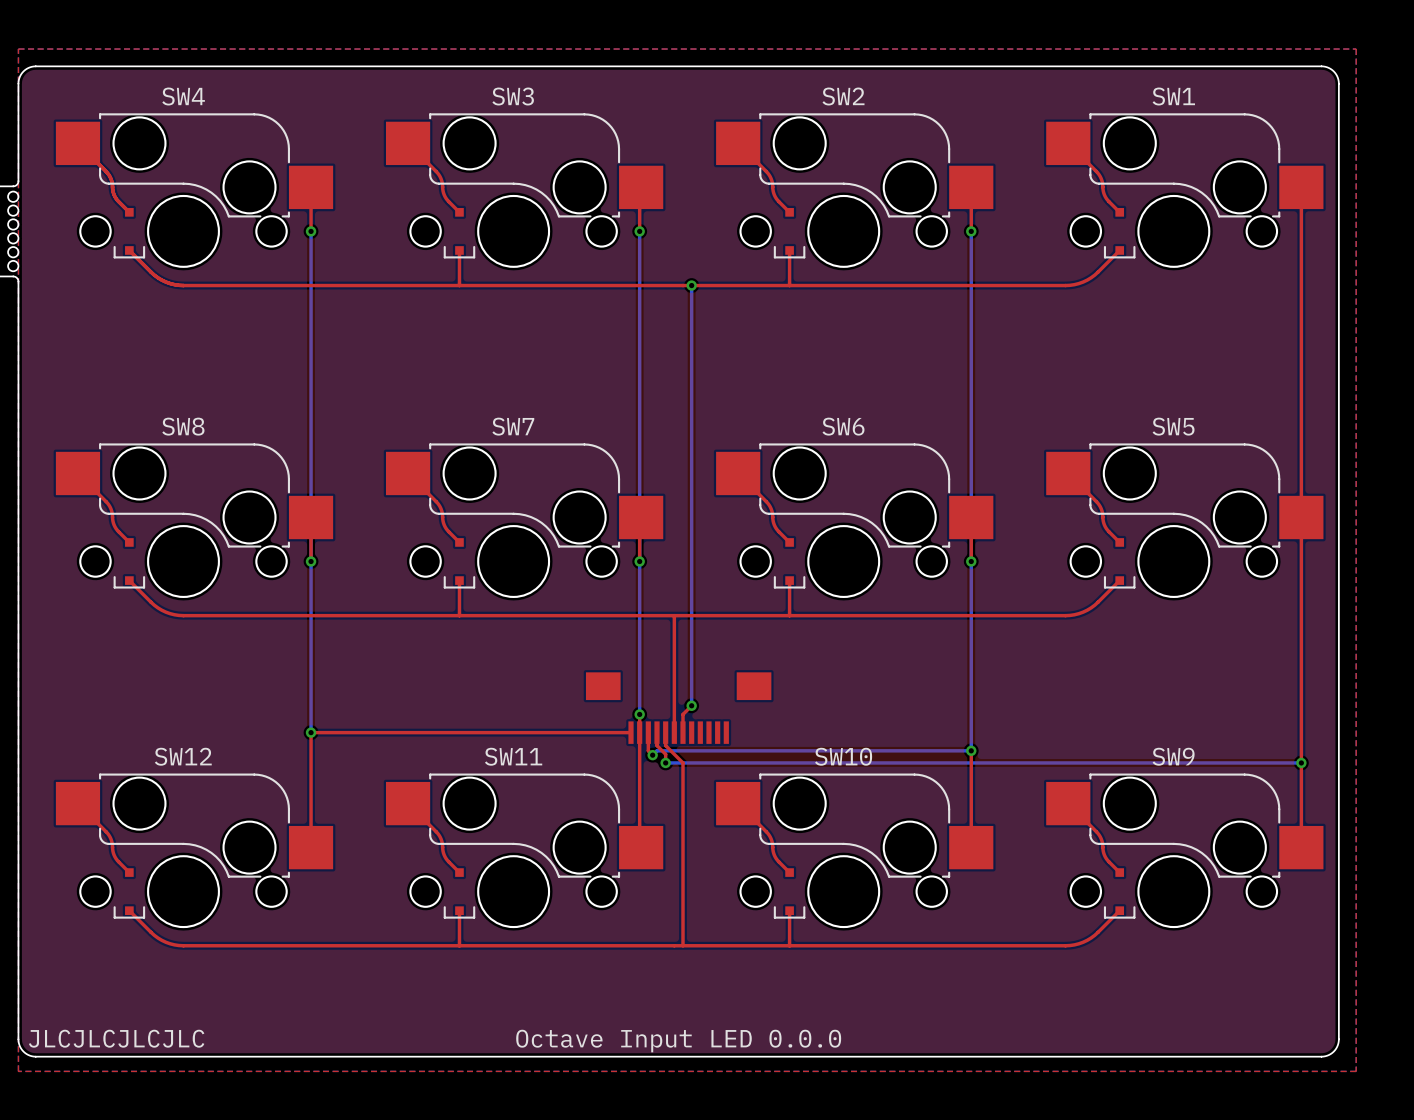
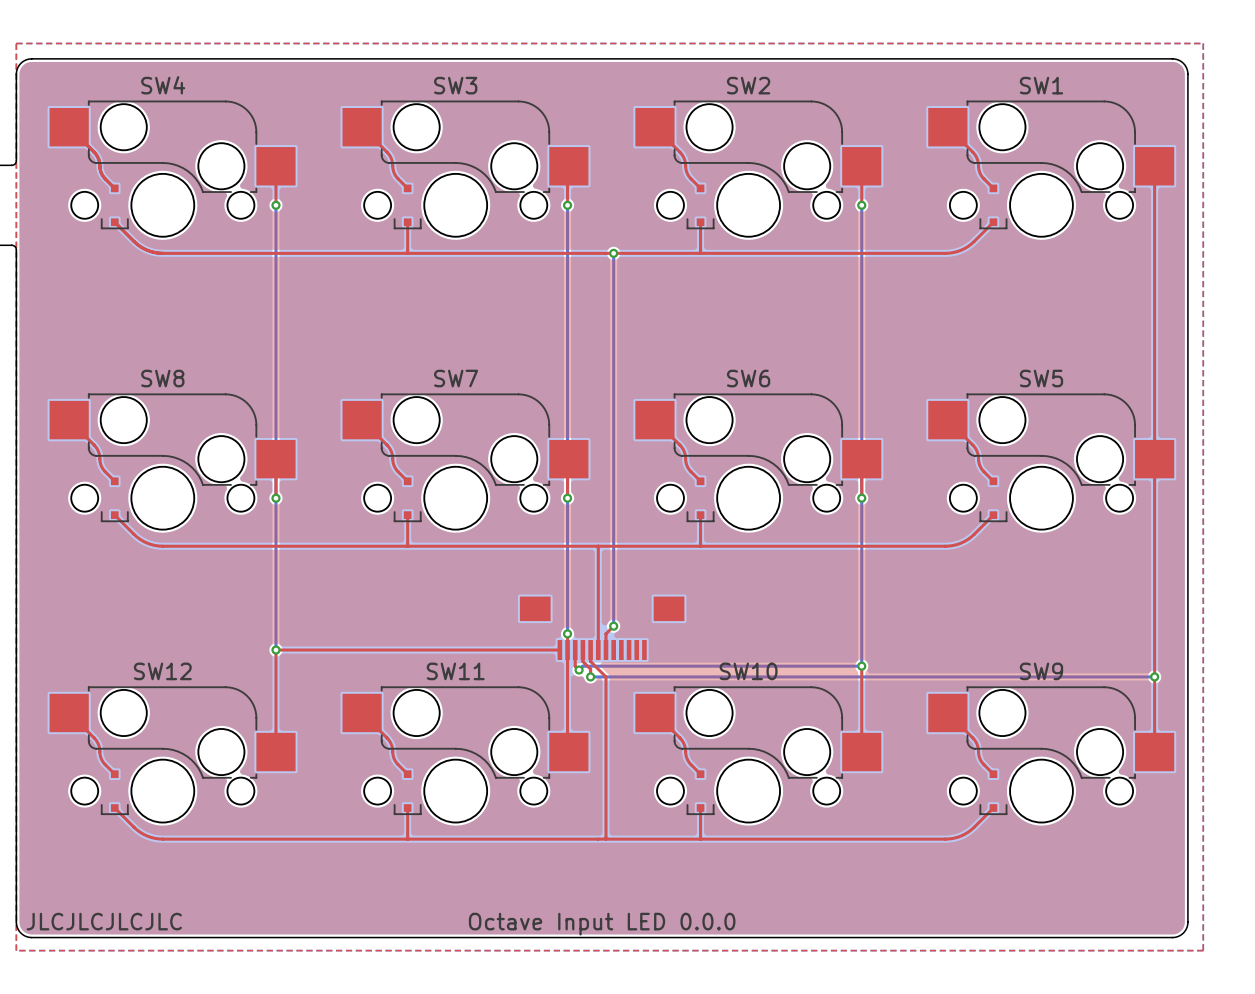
round board edge: [7, 190, 20, 203] -> none
round board edge: [7, 204, 20, 217] -> none
round board edge: [7, 218, 20, 231] -> none
round board edge: [7, 232, 20, 245] -> none
round board edge: [7, 246, 20, 259] -> none
round board edge: [7, 259, 20, 273] -> none

